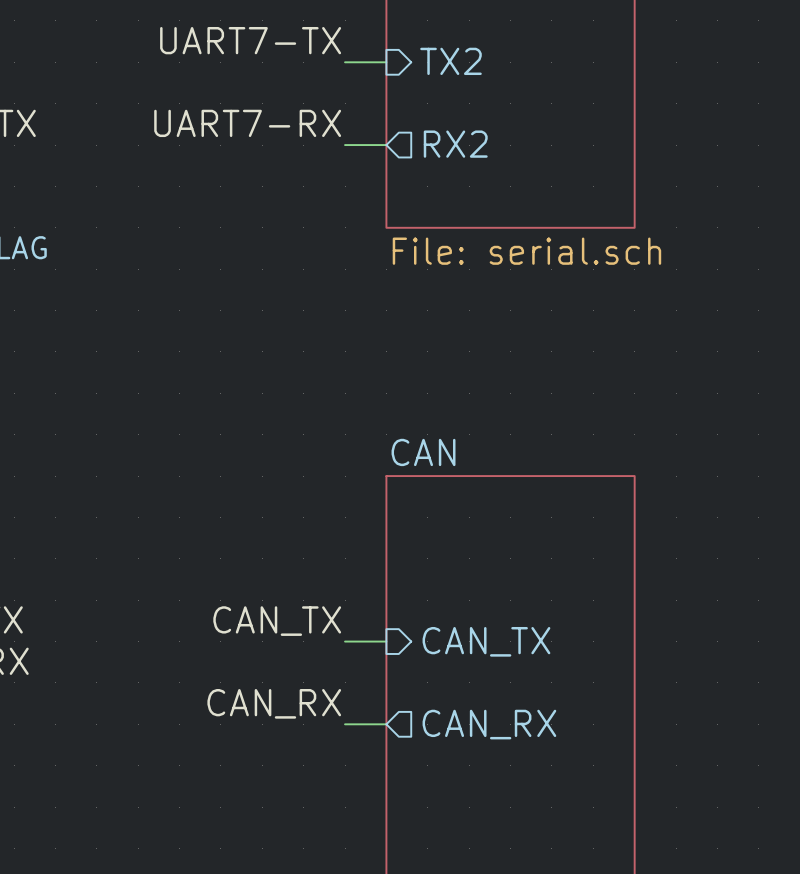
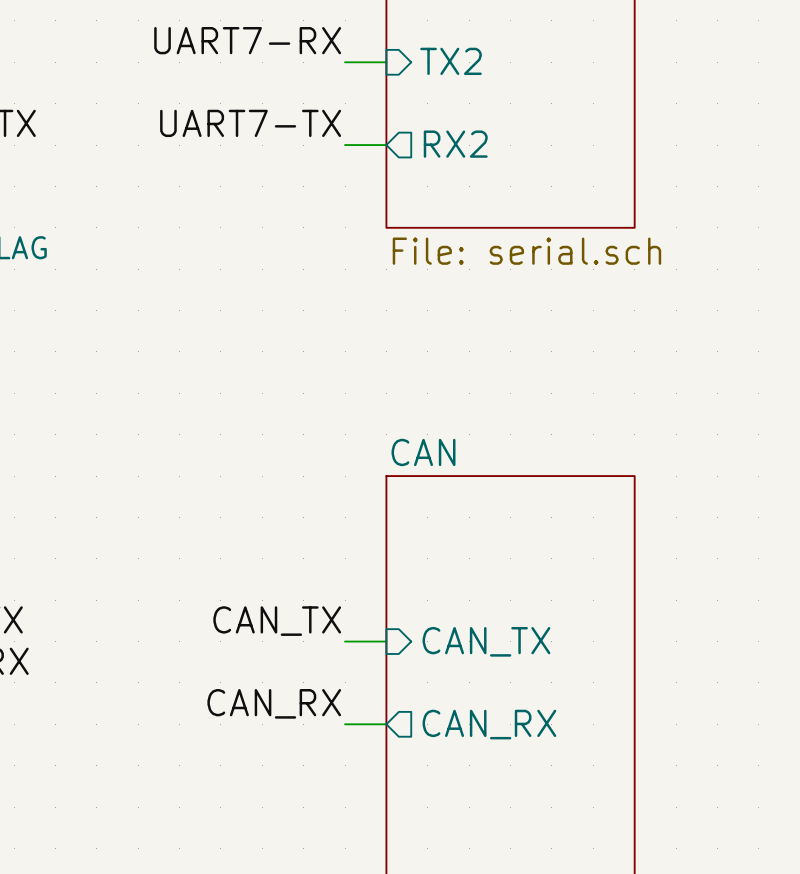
label: UART7-TX (250, 40) -> UART7-RX (247, 40)
label: UART7-RX (247, 123) -> UART7-TX (250, 123)

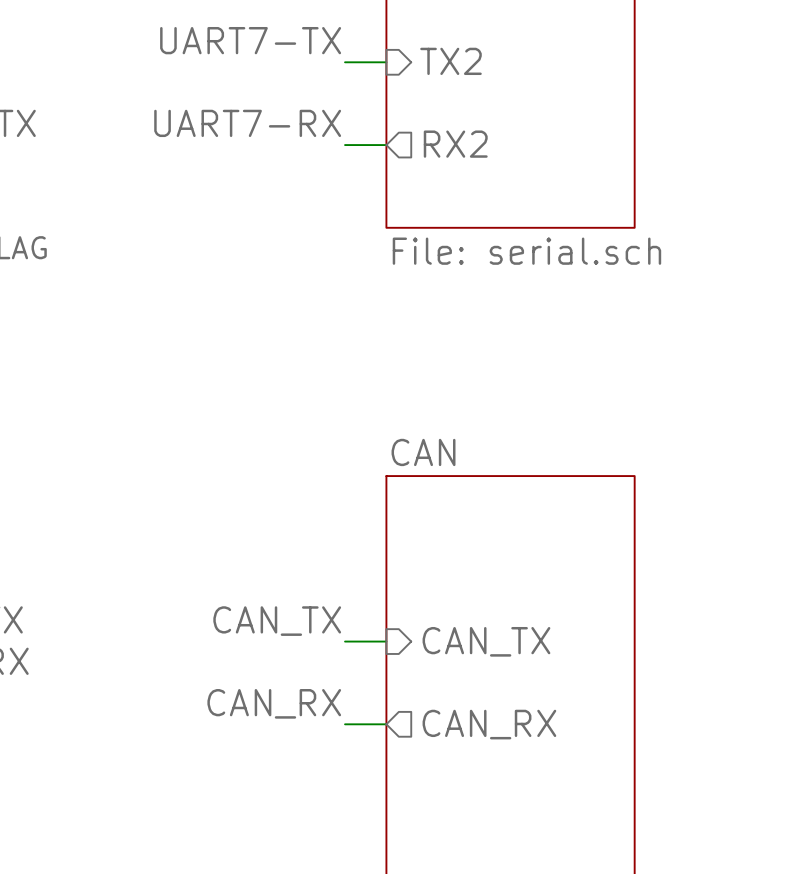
label: UART7-RX (247, 40) -> UART7-TX (250, 40)
label: UART7-TX (250, 123) -> UART7-RX (247, 123)

